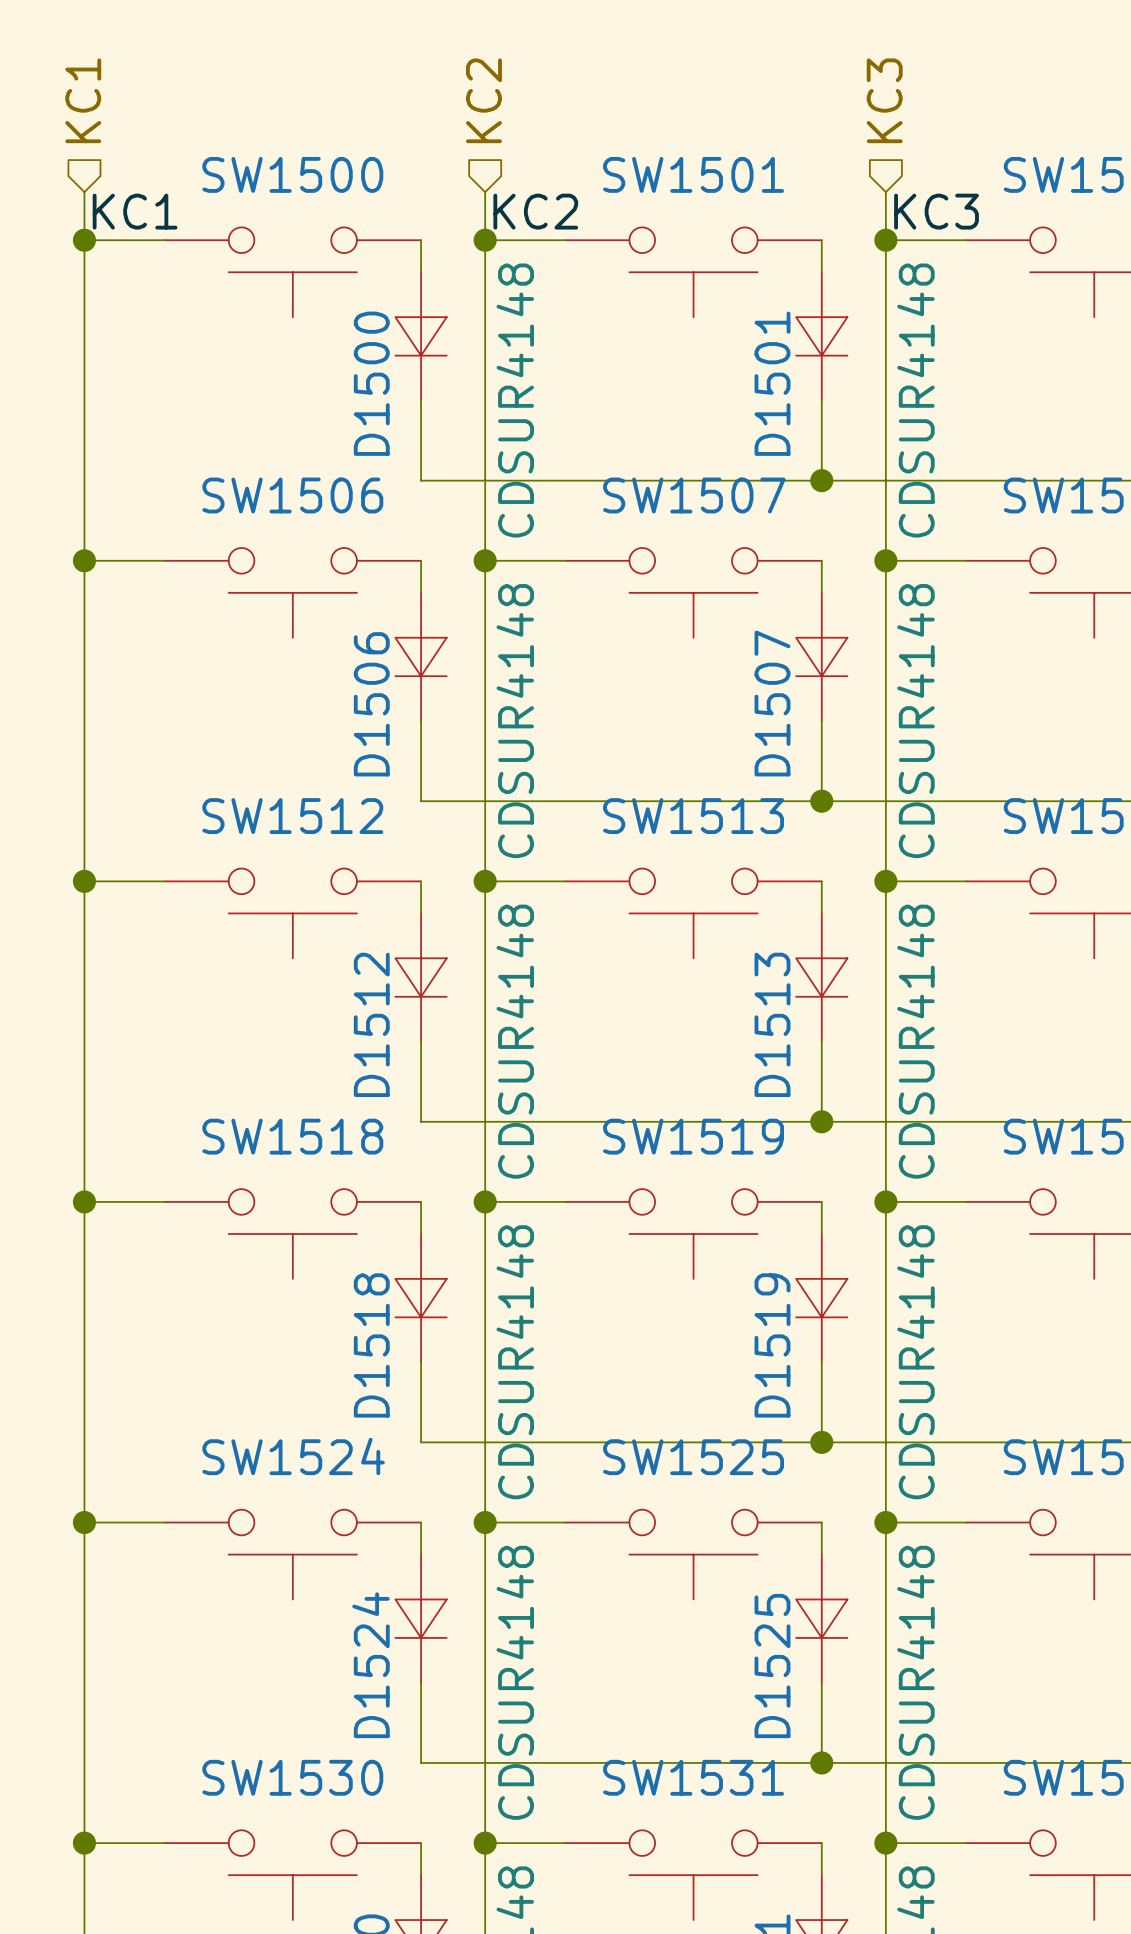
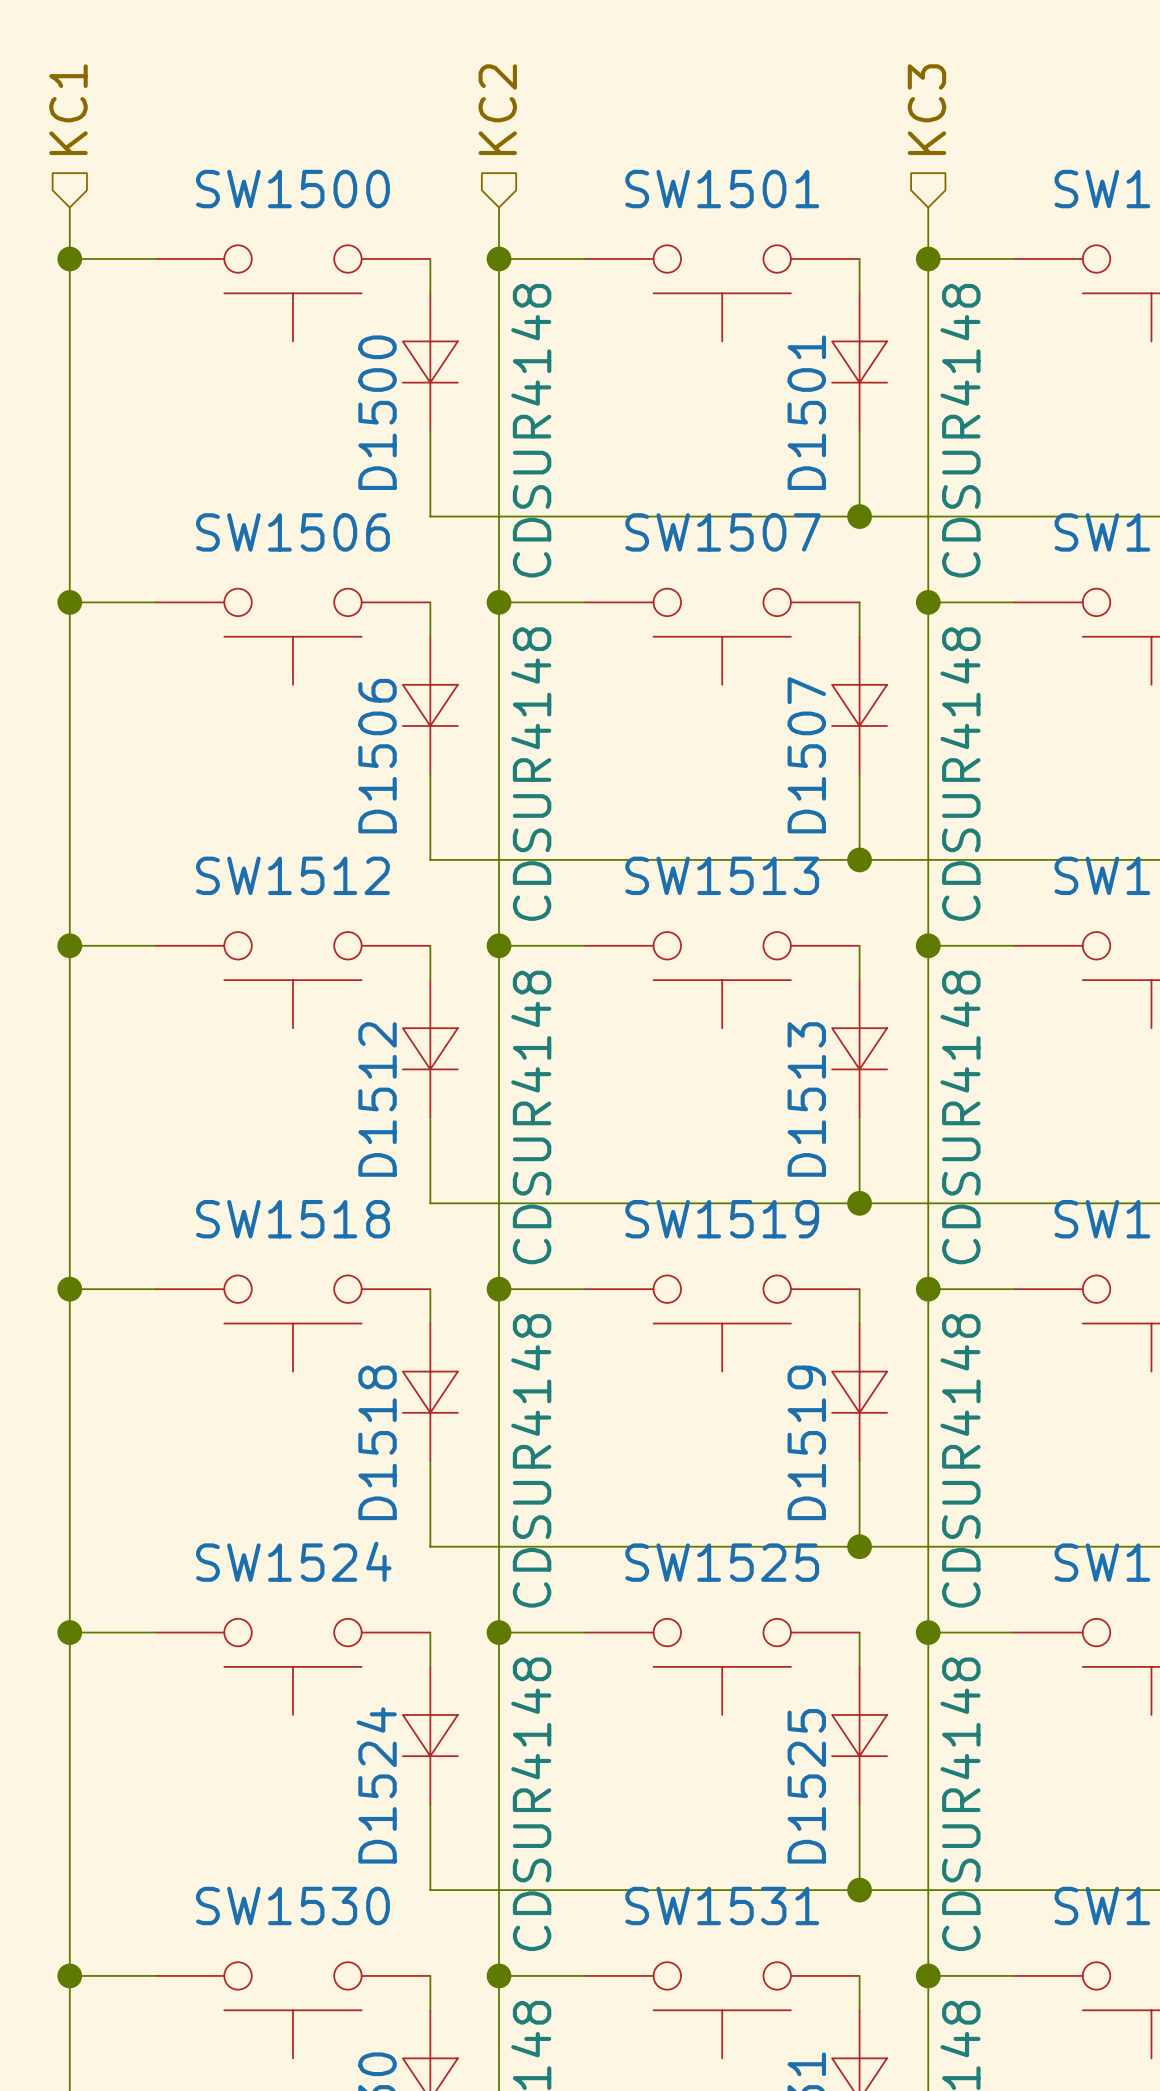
label: KC1 (135, 211) -> none
label: KC2 (535, 211) -> none
label: KC3 (936, 211) -> none

